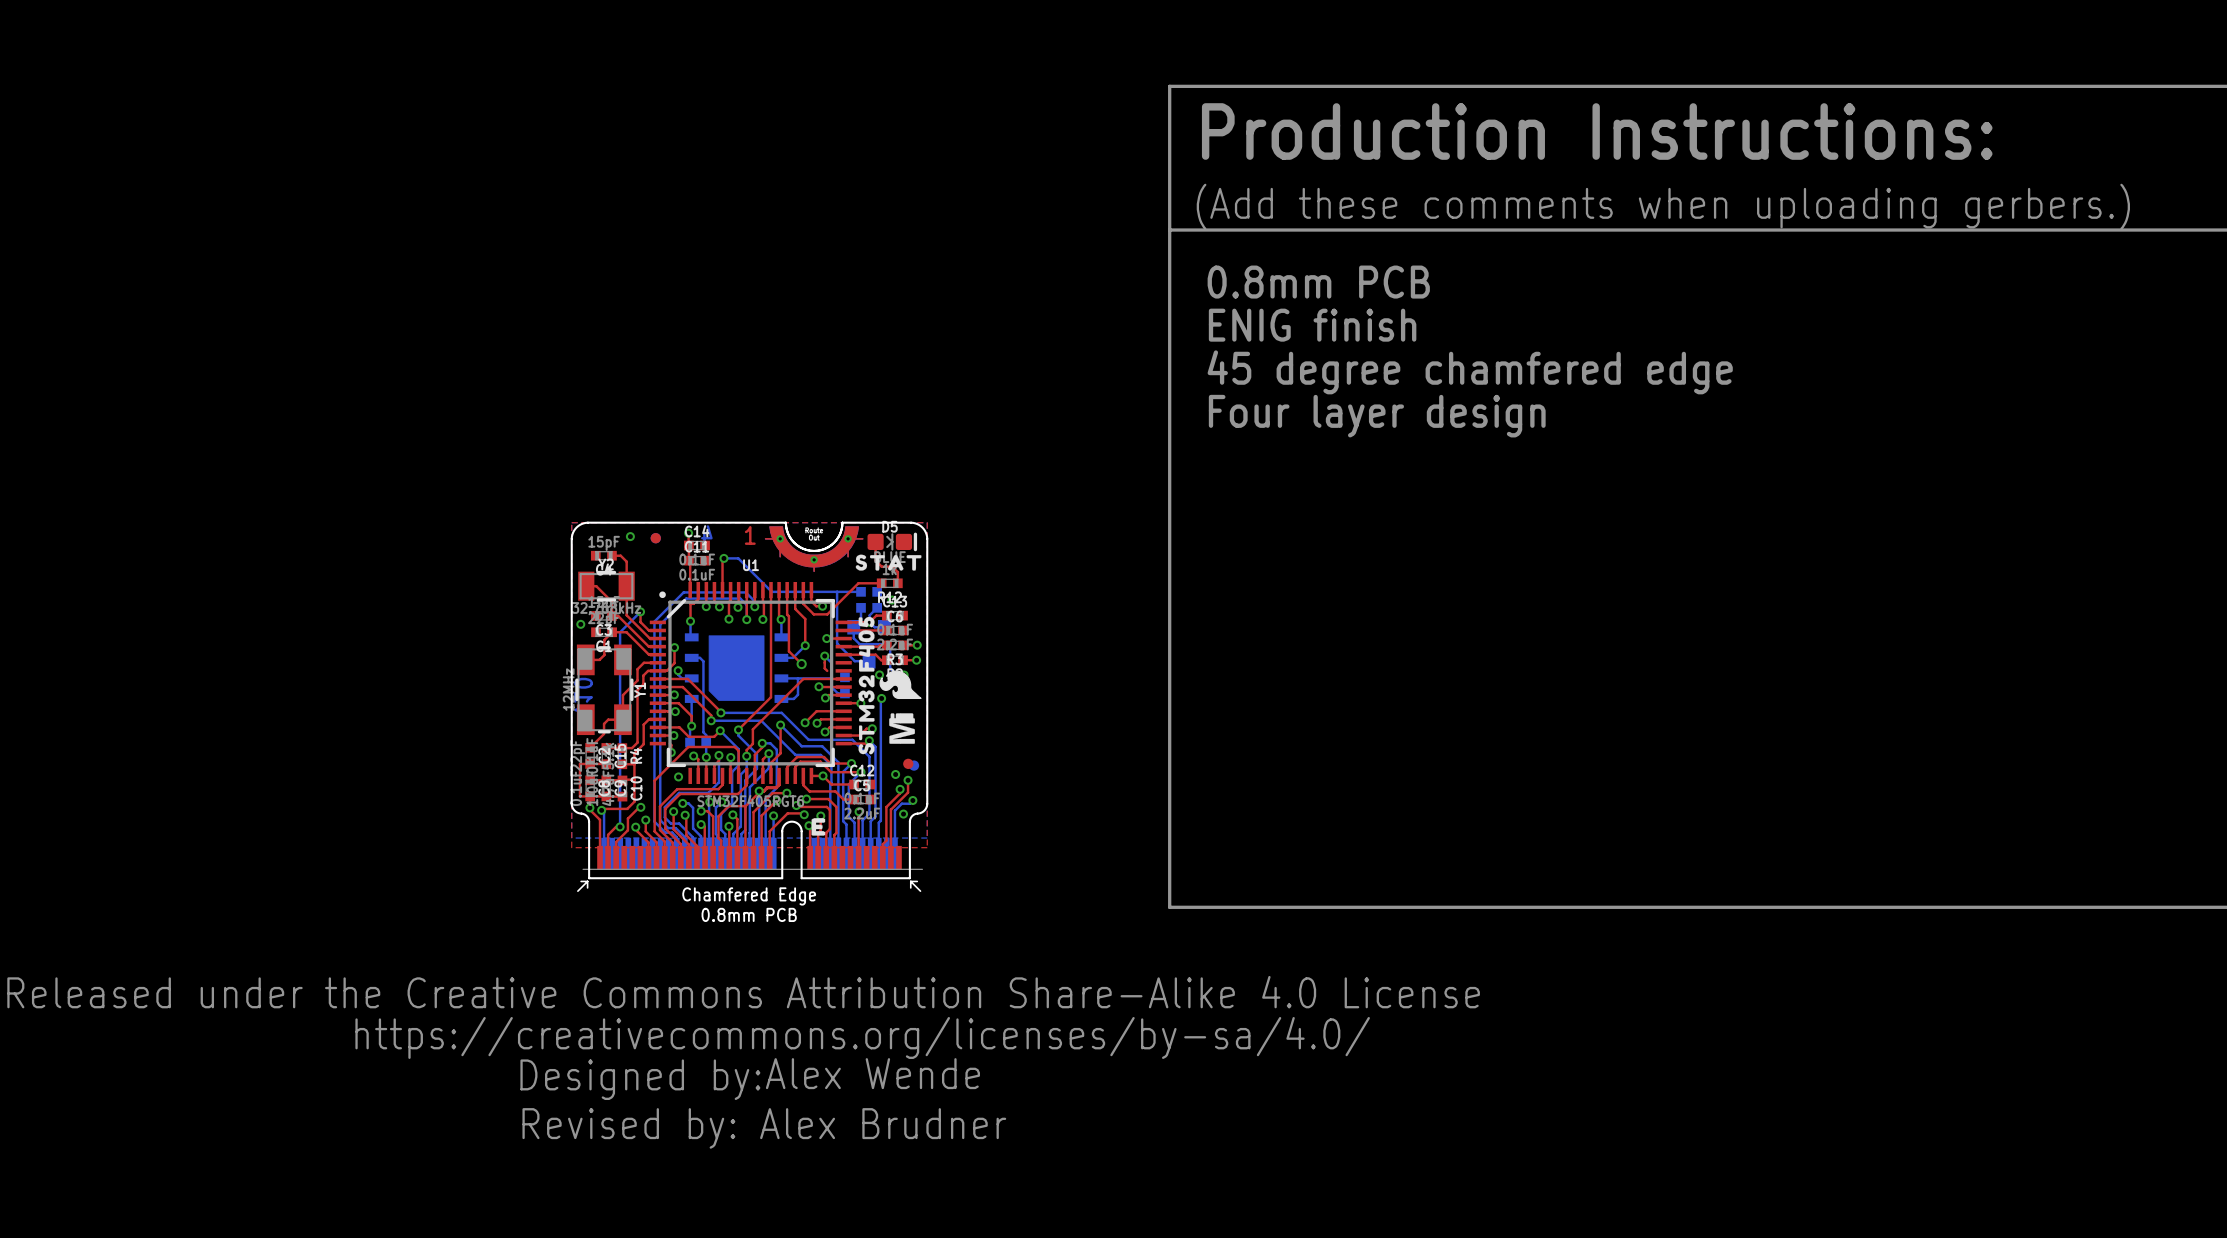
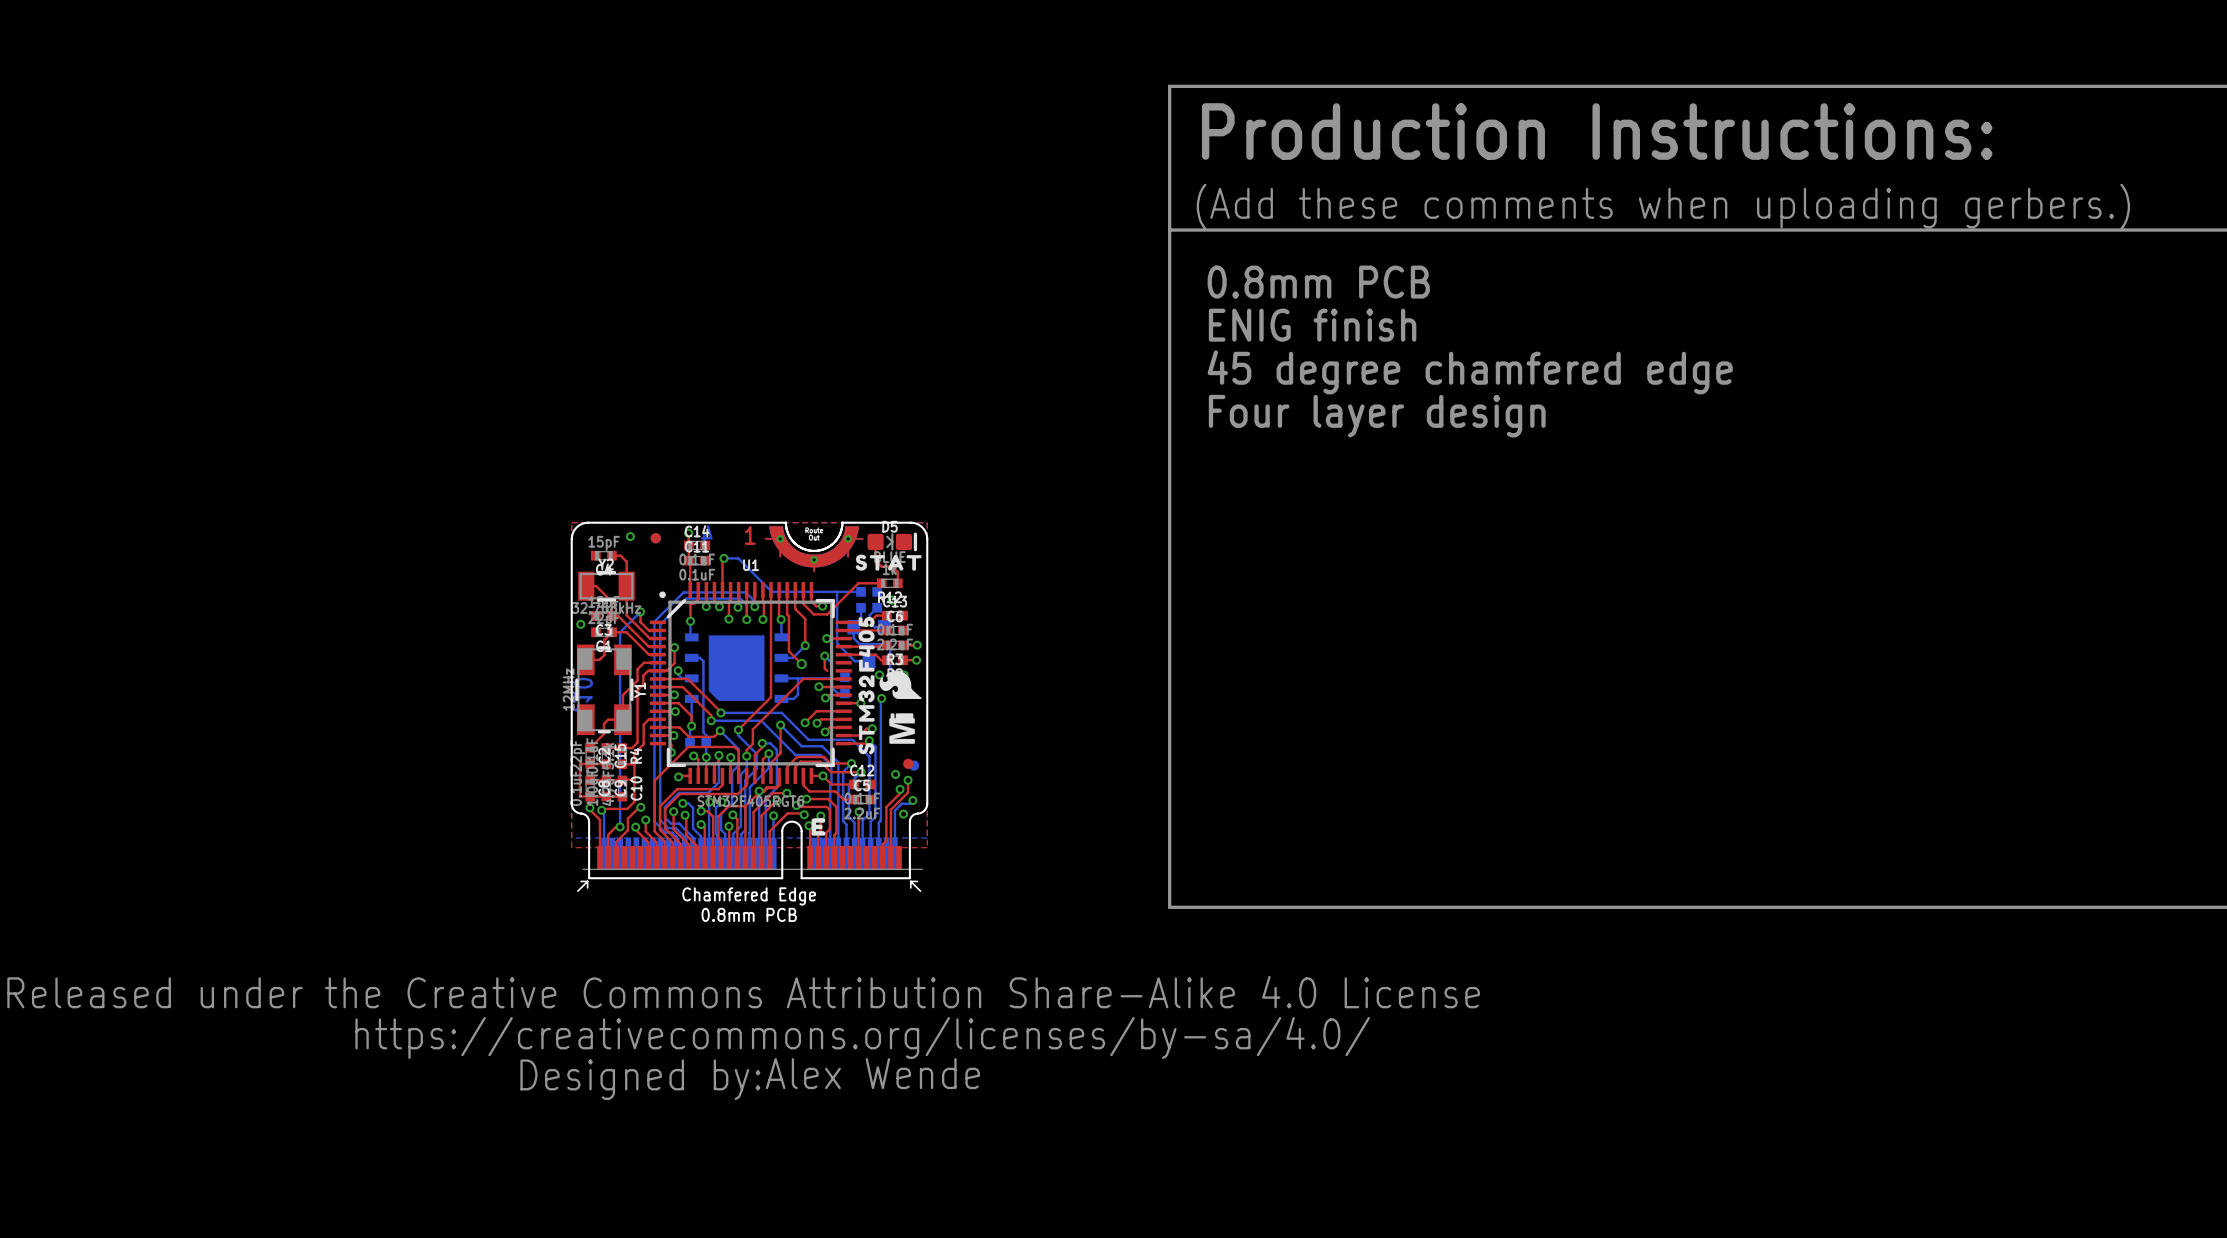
top track: none -> (679, 775) (690, 775)
text: Revised by: Alex Brudner (764, 1128) -> none

